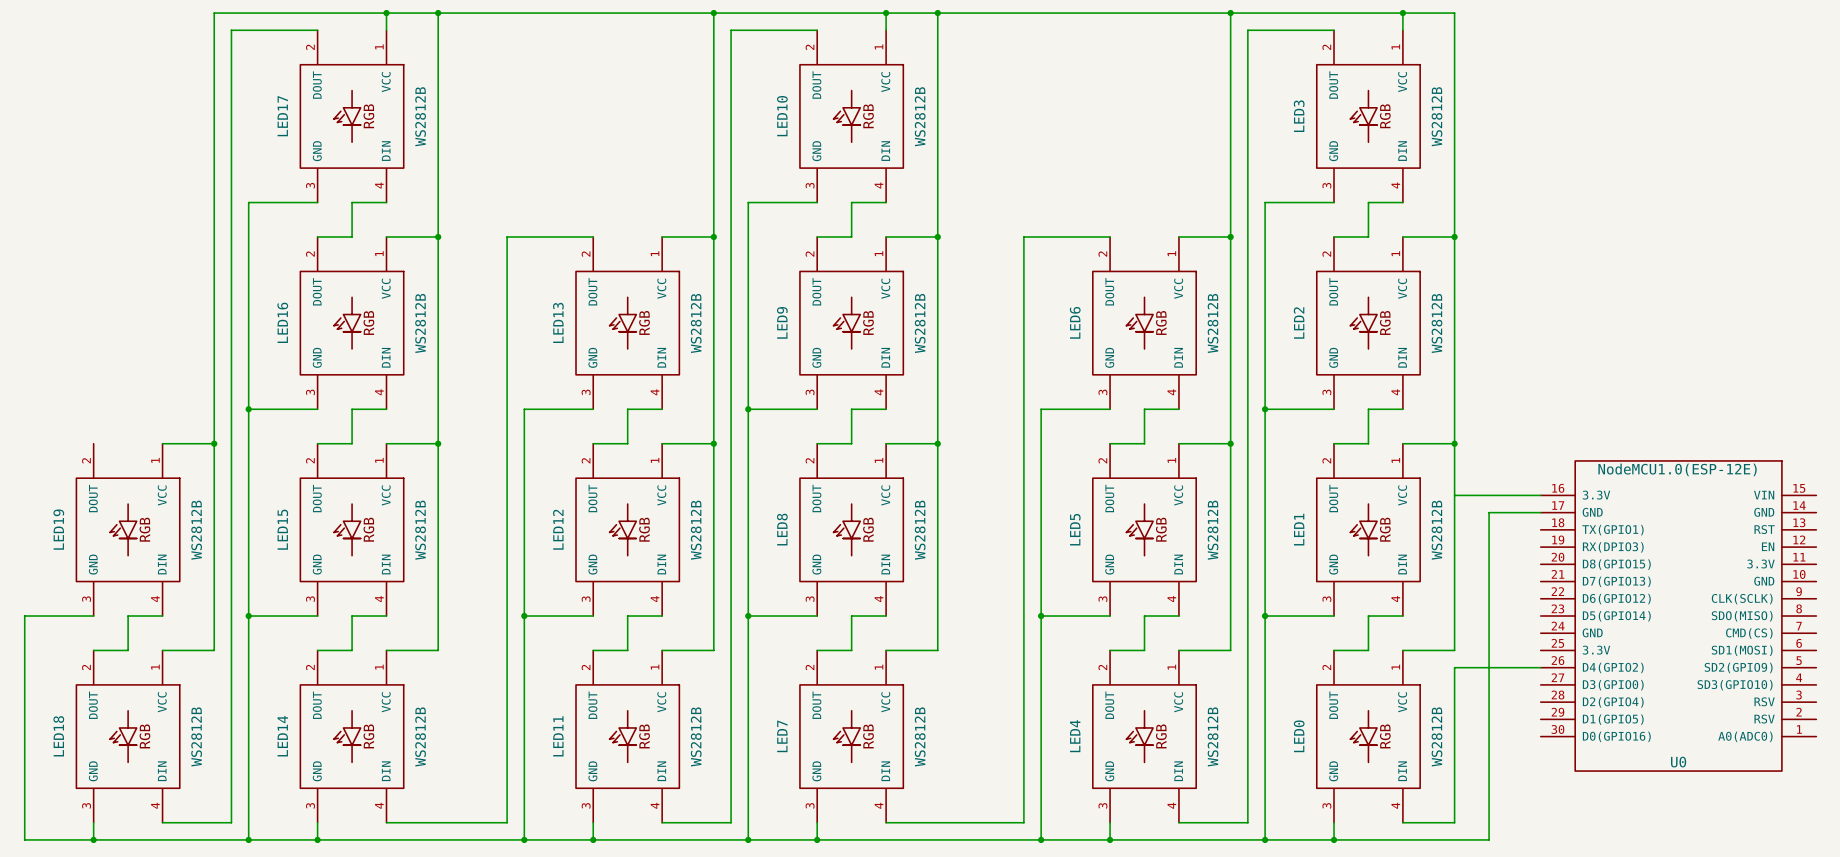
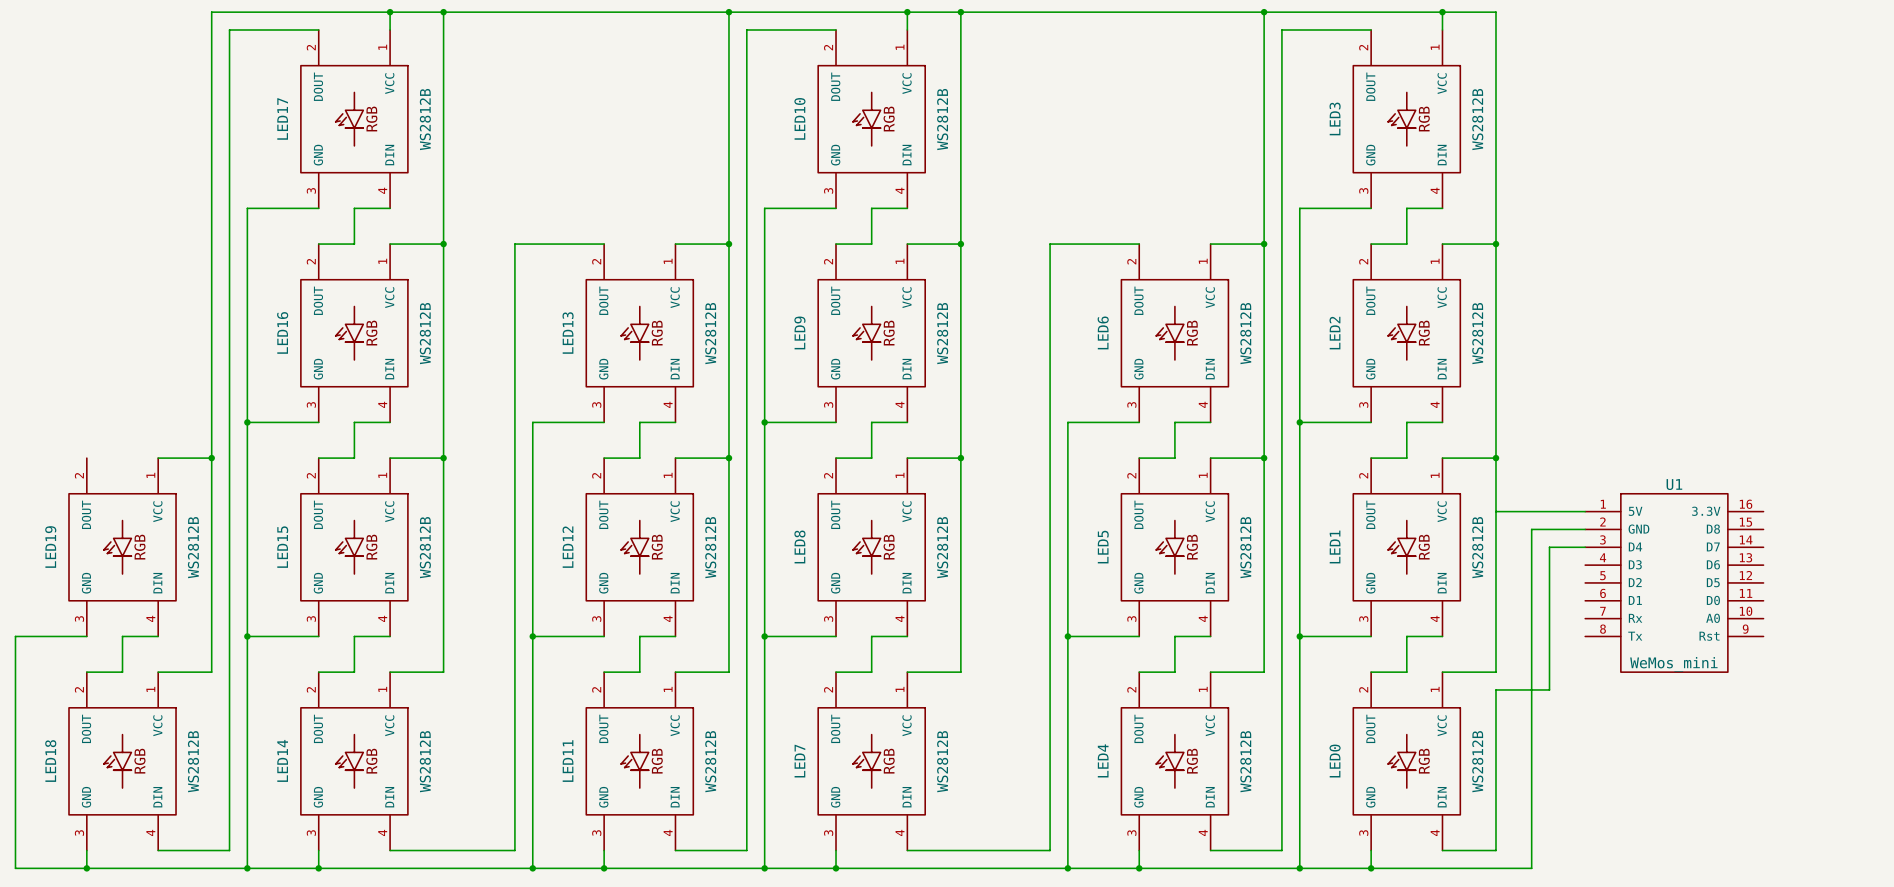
U1: none -> WeMos_mini (1674, 582)
U0: NodeMCU1.0(ESP-12E) (1678, 616) -> none
wire: (1506, 667) (1540, 667) -> (1549, 689) (1549, 547) (1585, 547)

